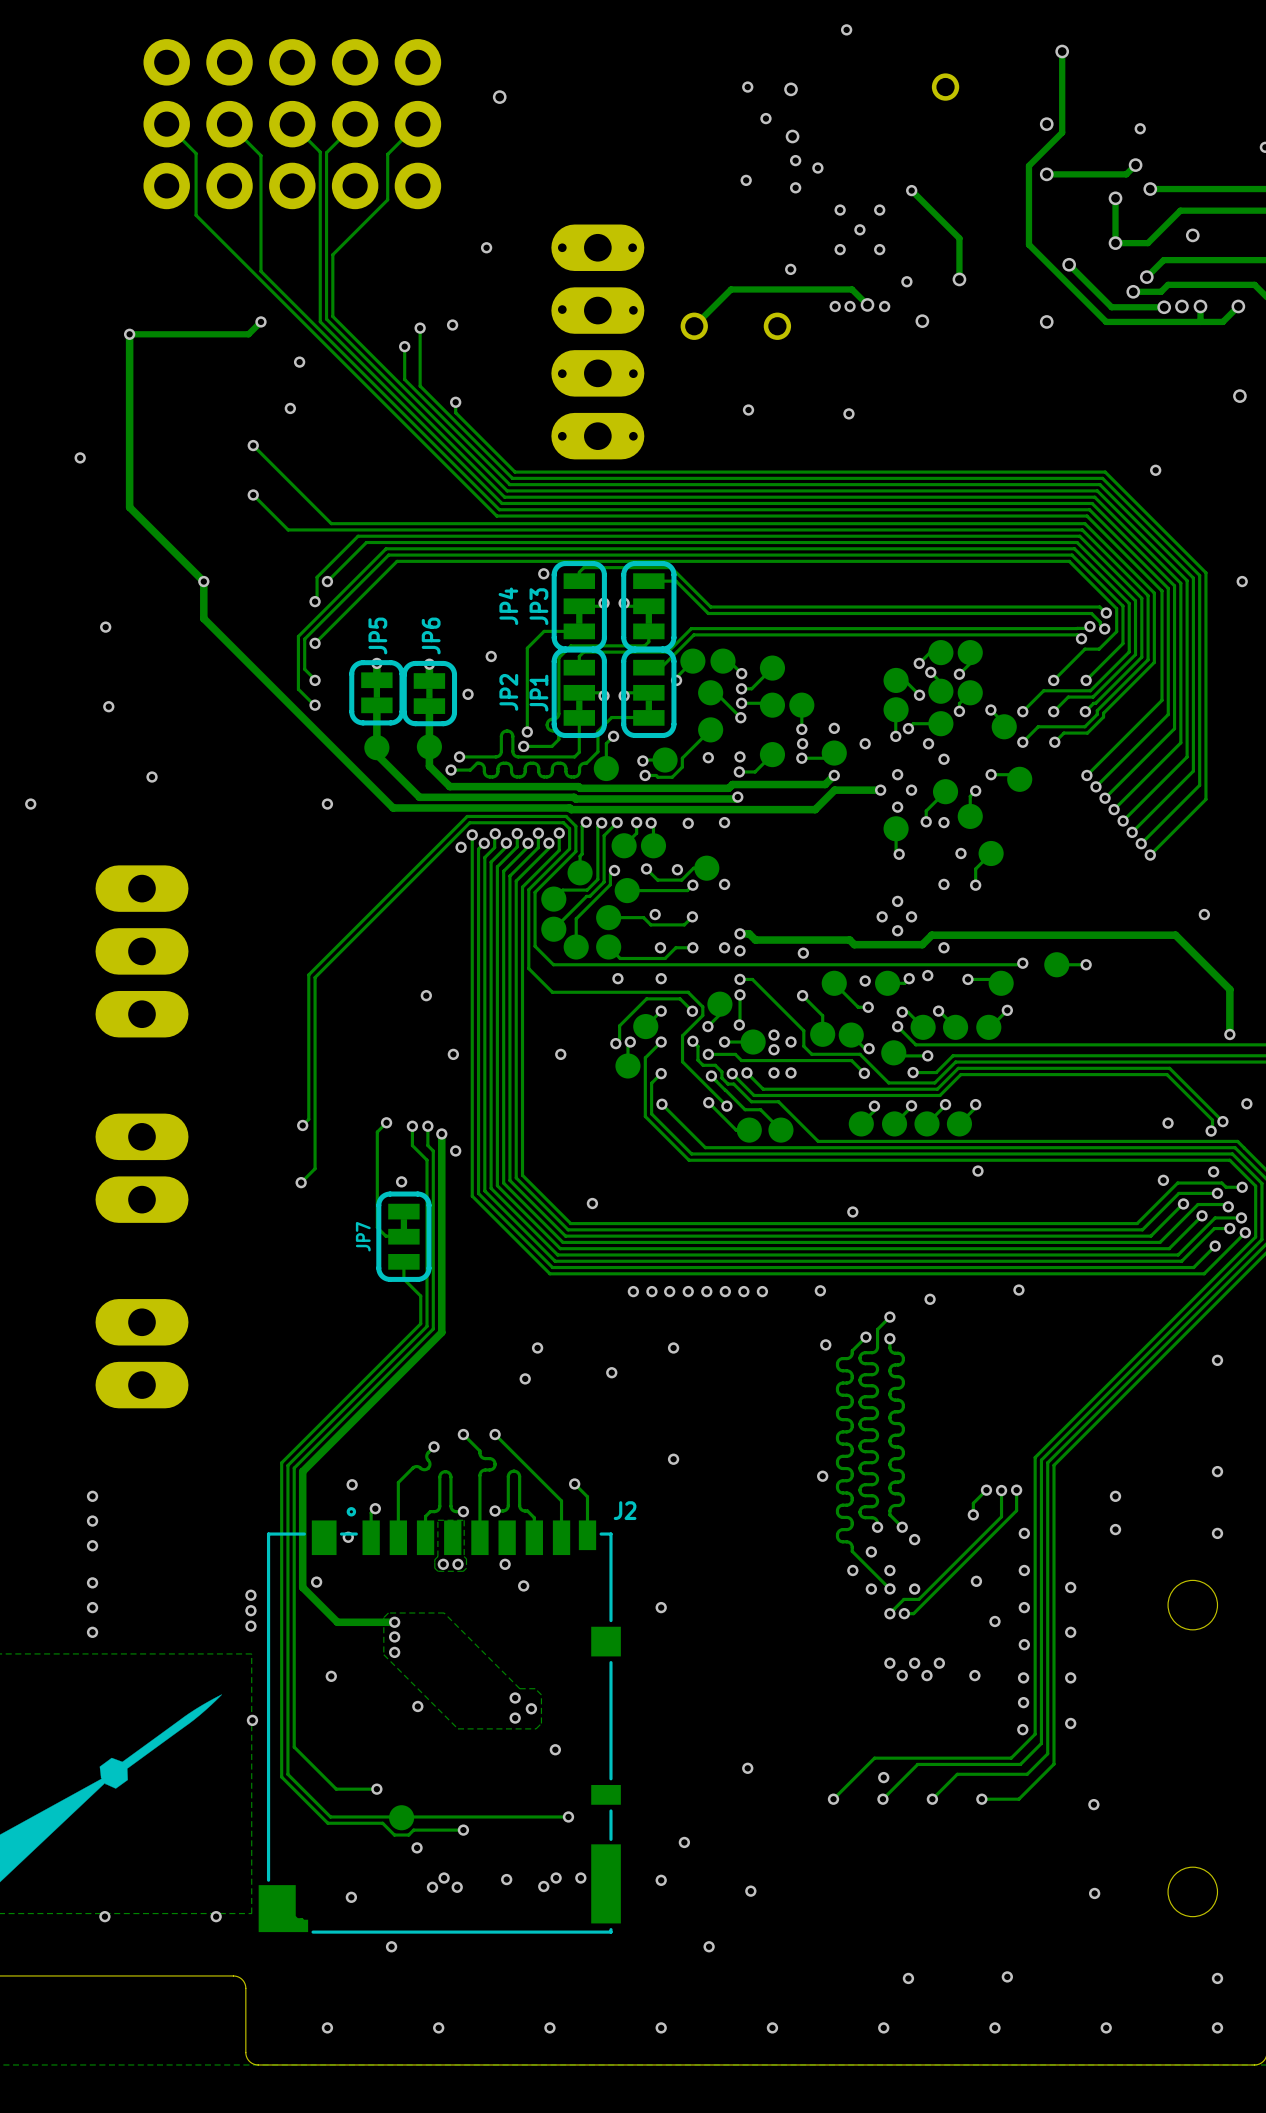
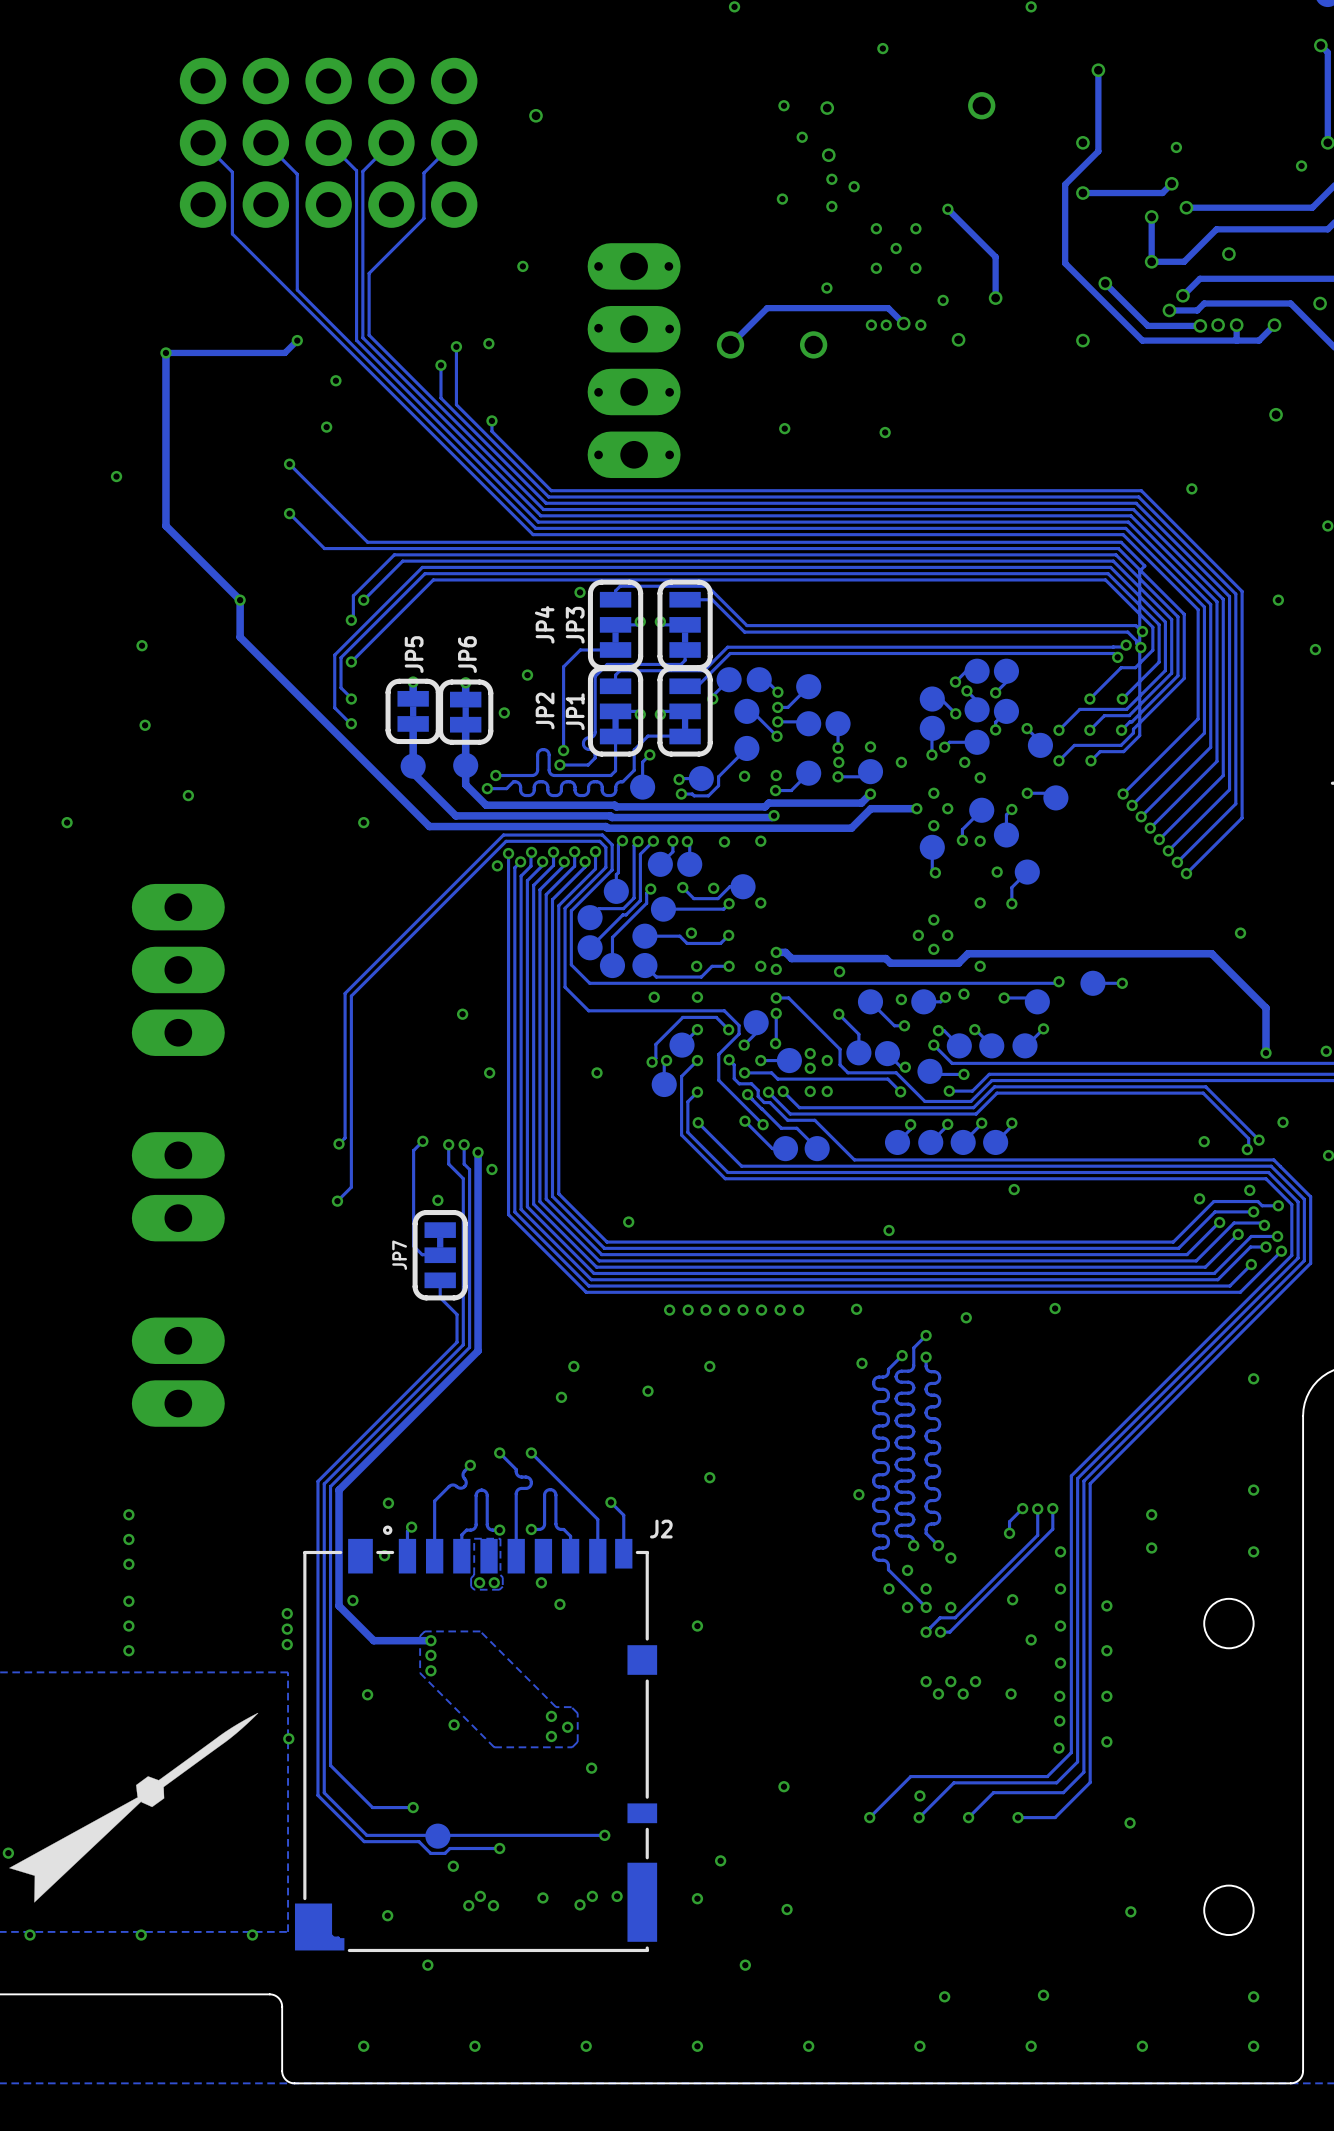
track: (1108, 547) (1154, 593) (1154, 662) (1103, 713) -> (1144, 565) (1139, 571) (1139, 731)

